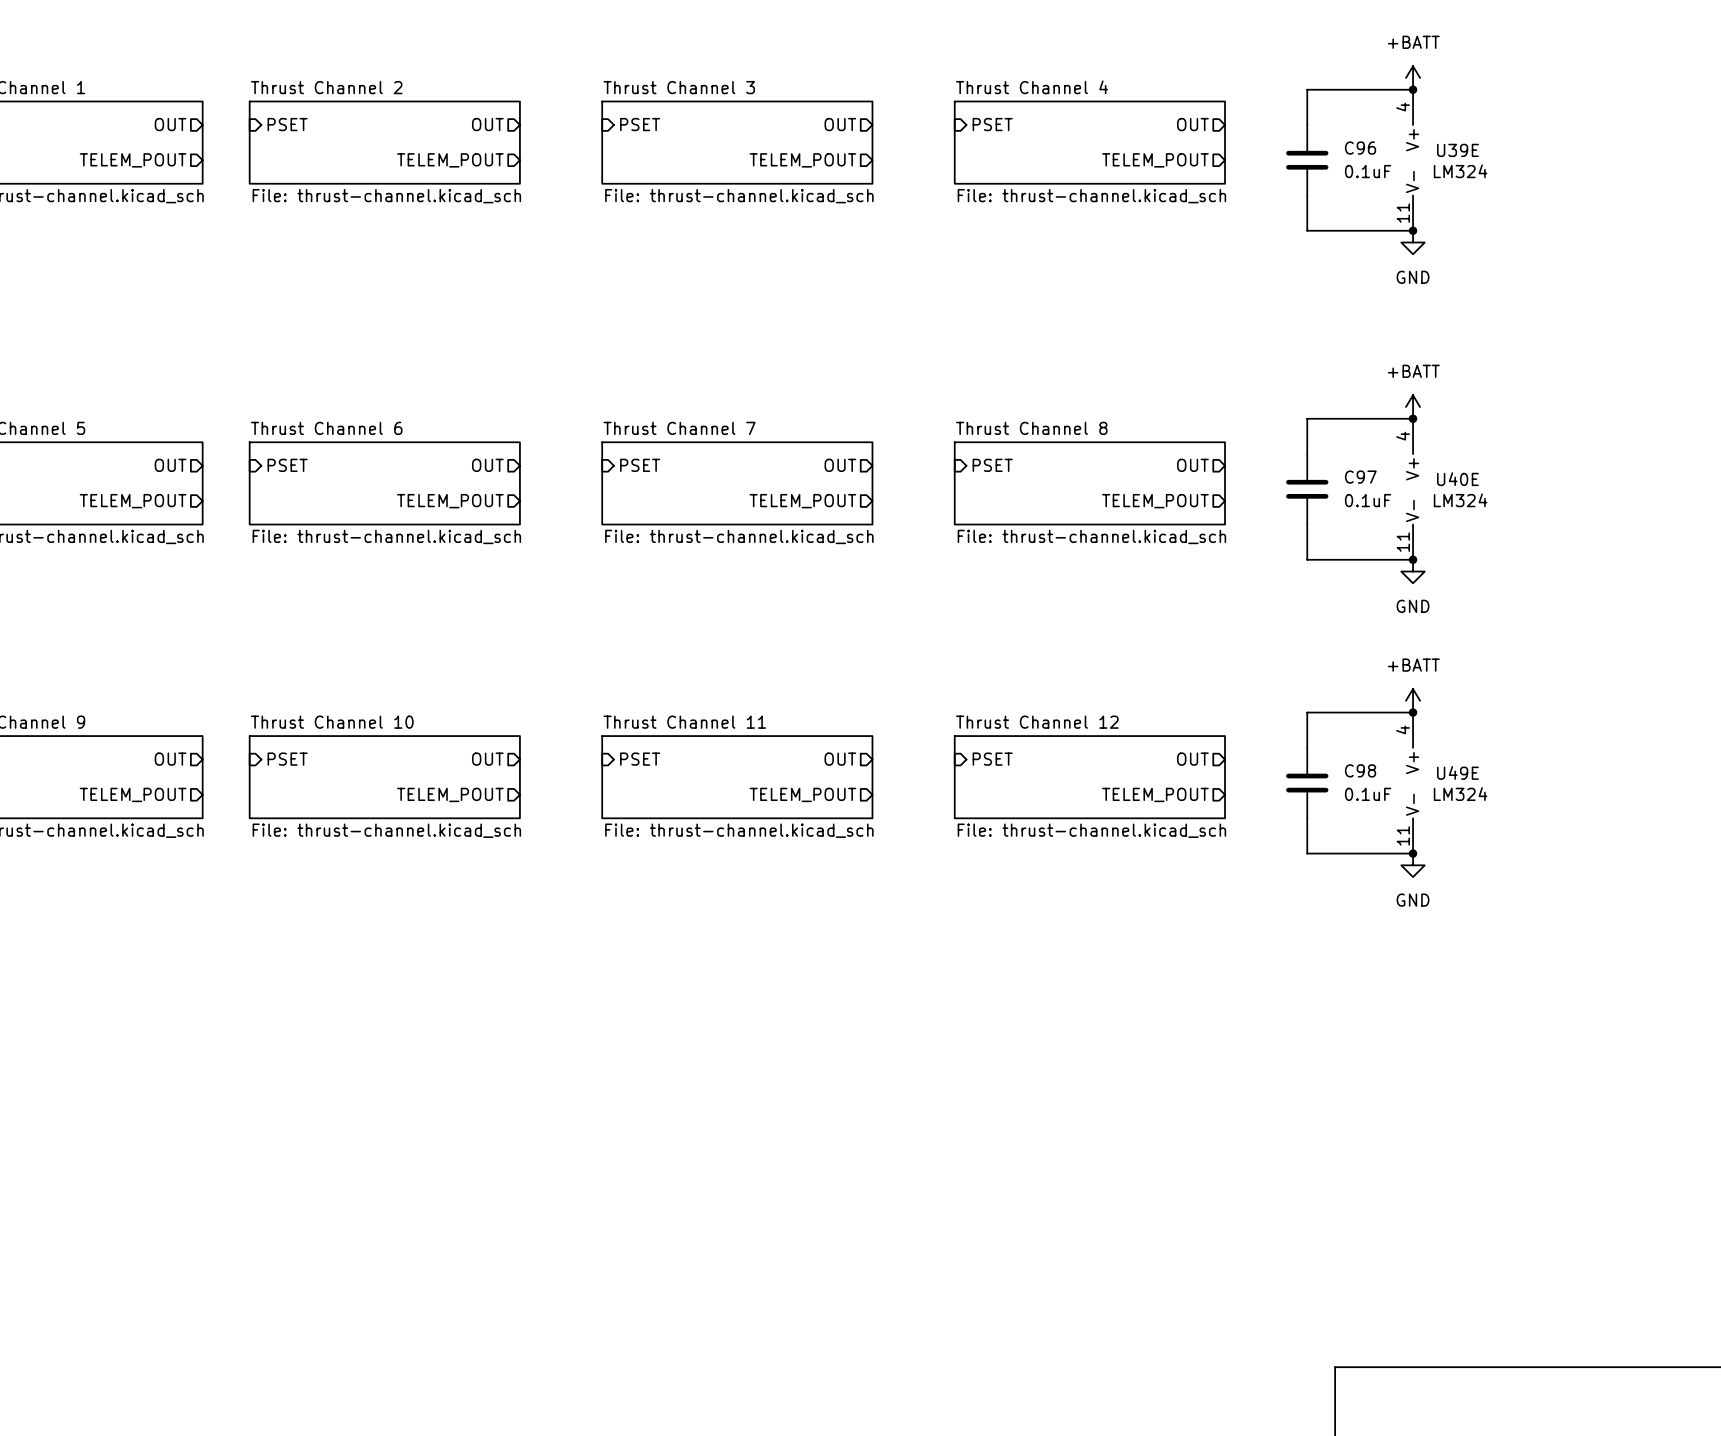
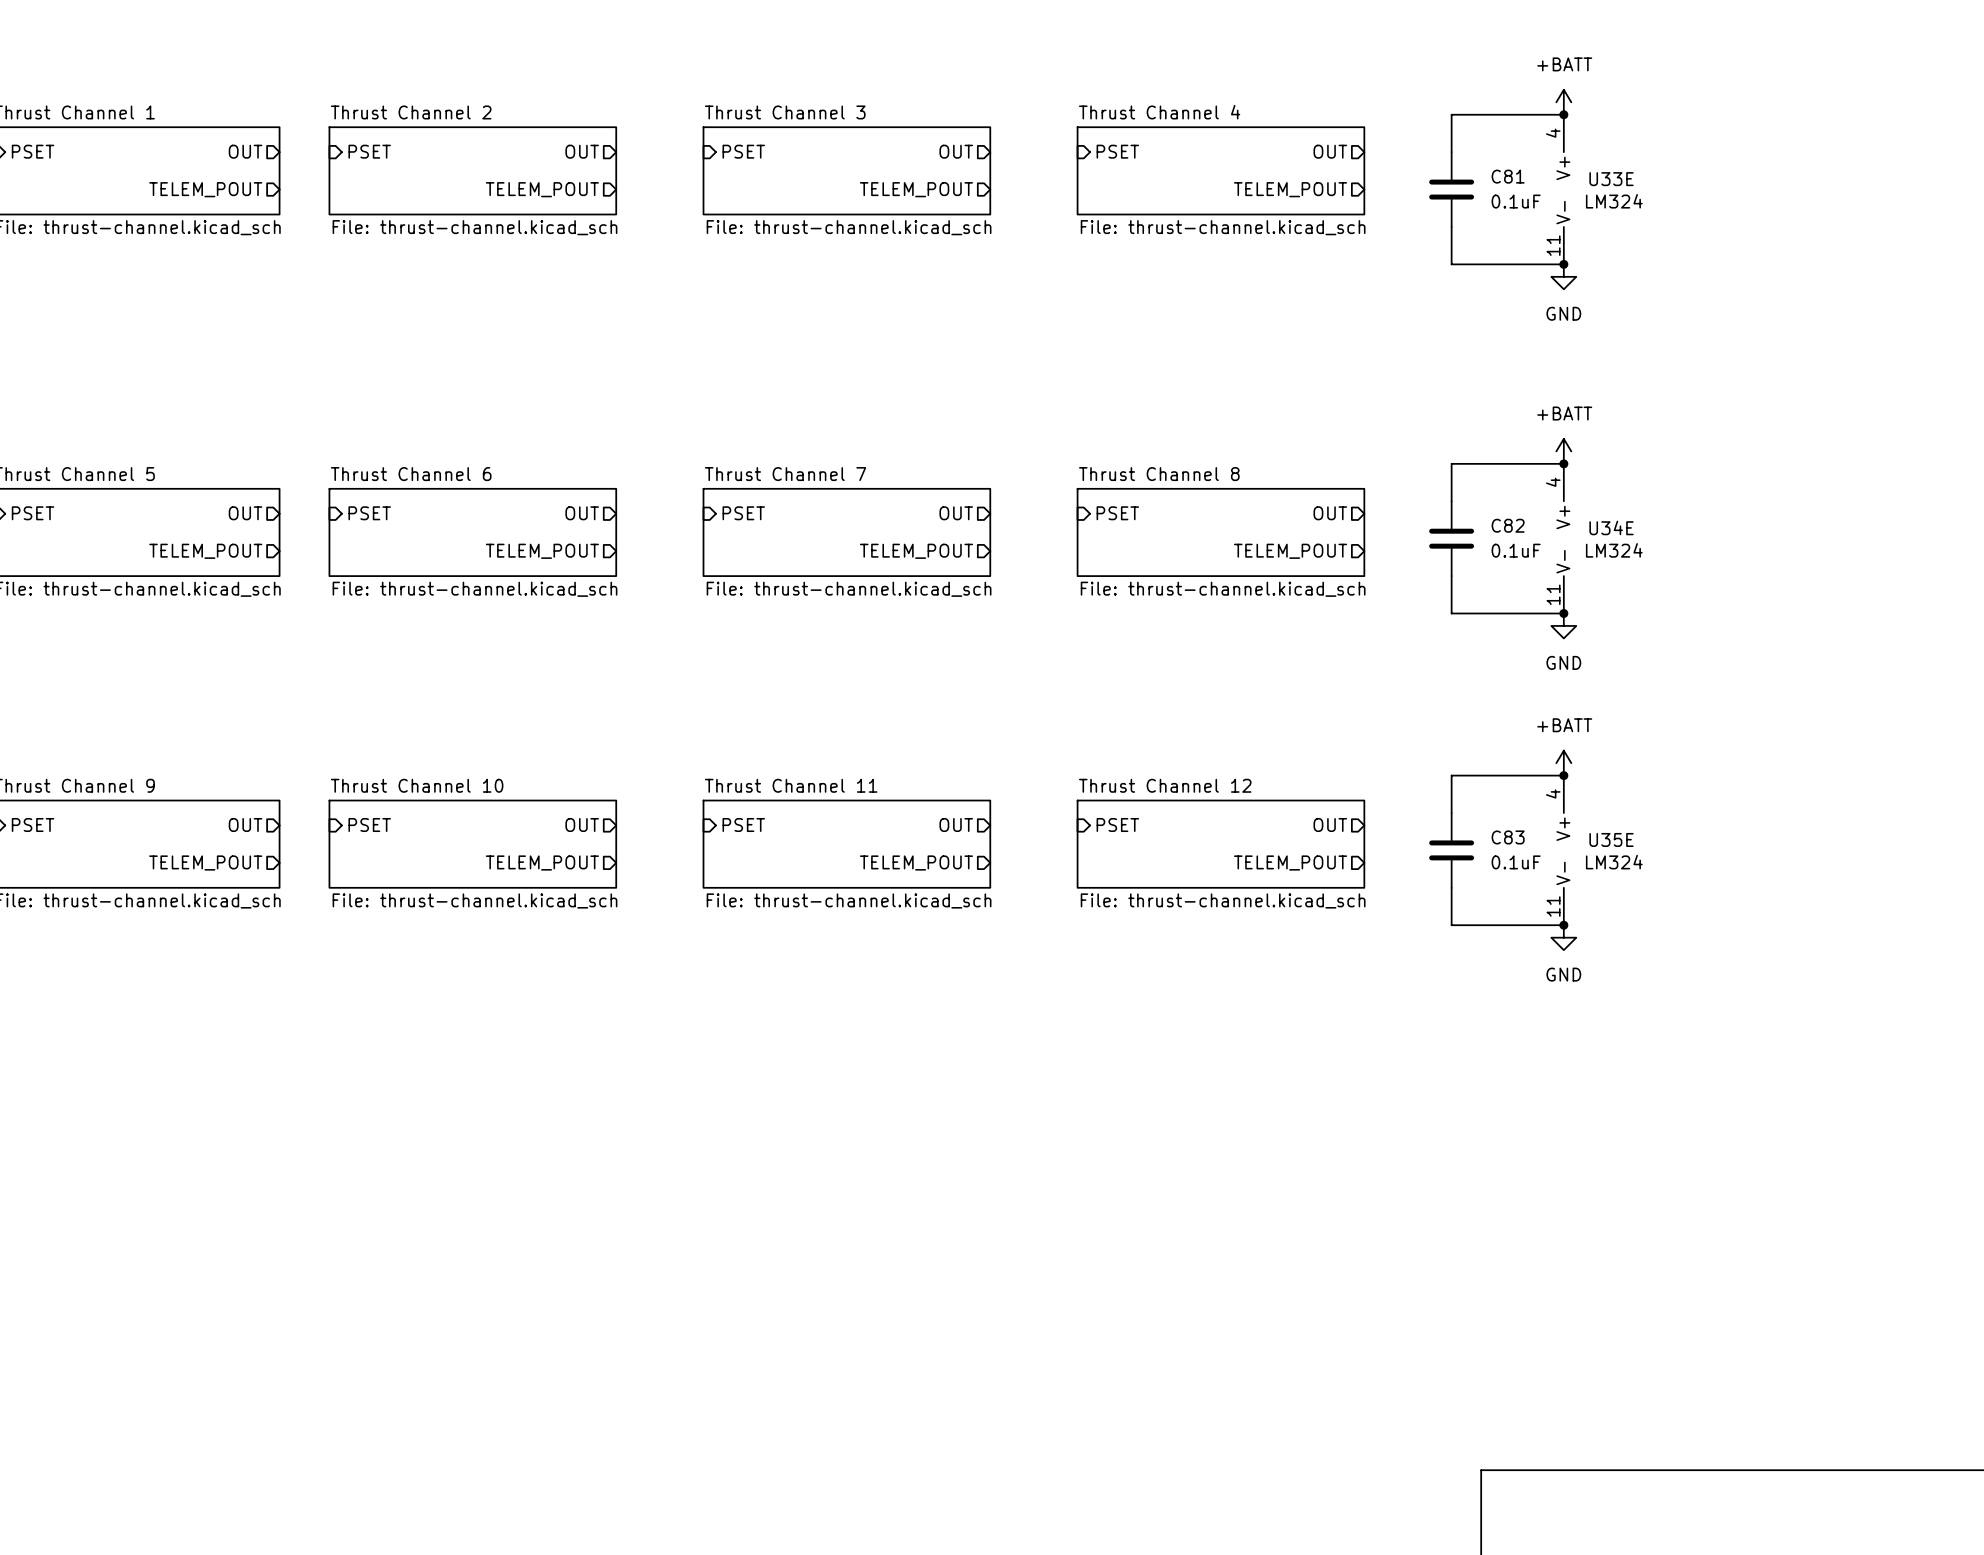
C96 name: C96 (1360, 148) -> C81 (1508, 176)
U39E name: U39E (1457, 150) -> U33E (1611, 179)
C97 name: C97 (1360, 477) -> C82 (1508, 525)
U40E name: U40E (1457, 479) -> U34E (1611, 527)
C98 name: C98 (1360, 770) -> C83 (1508, 837)
U49E name: U49E (1457, 772) -> U35E (1611, 839)

